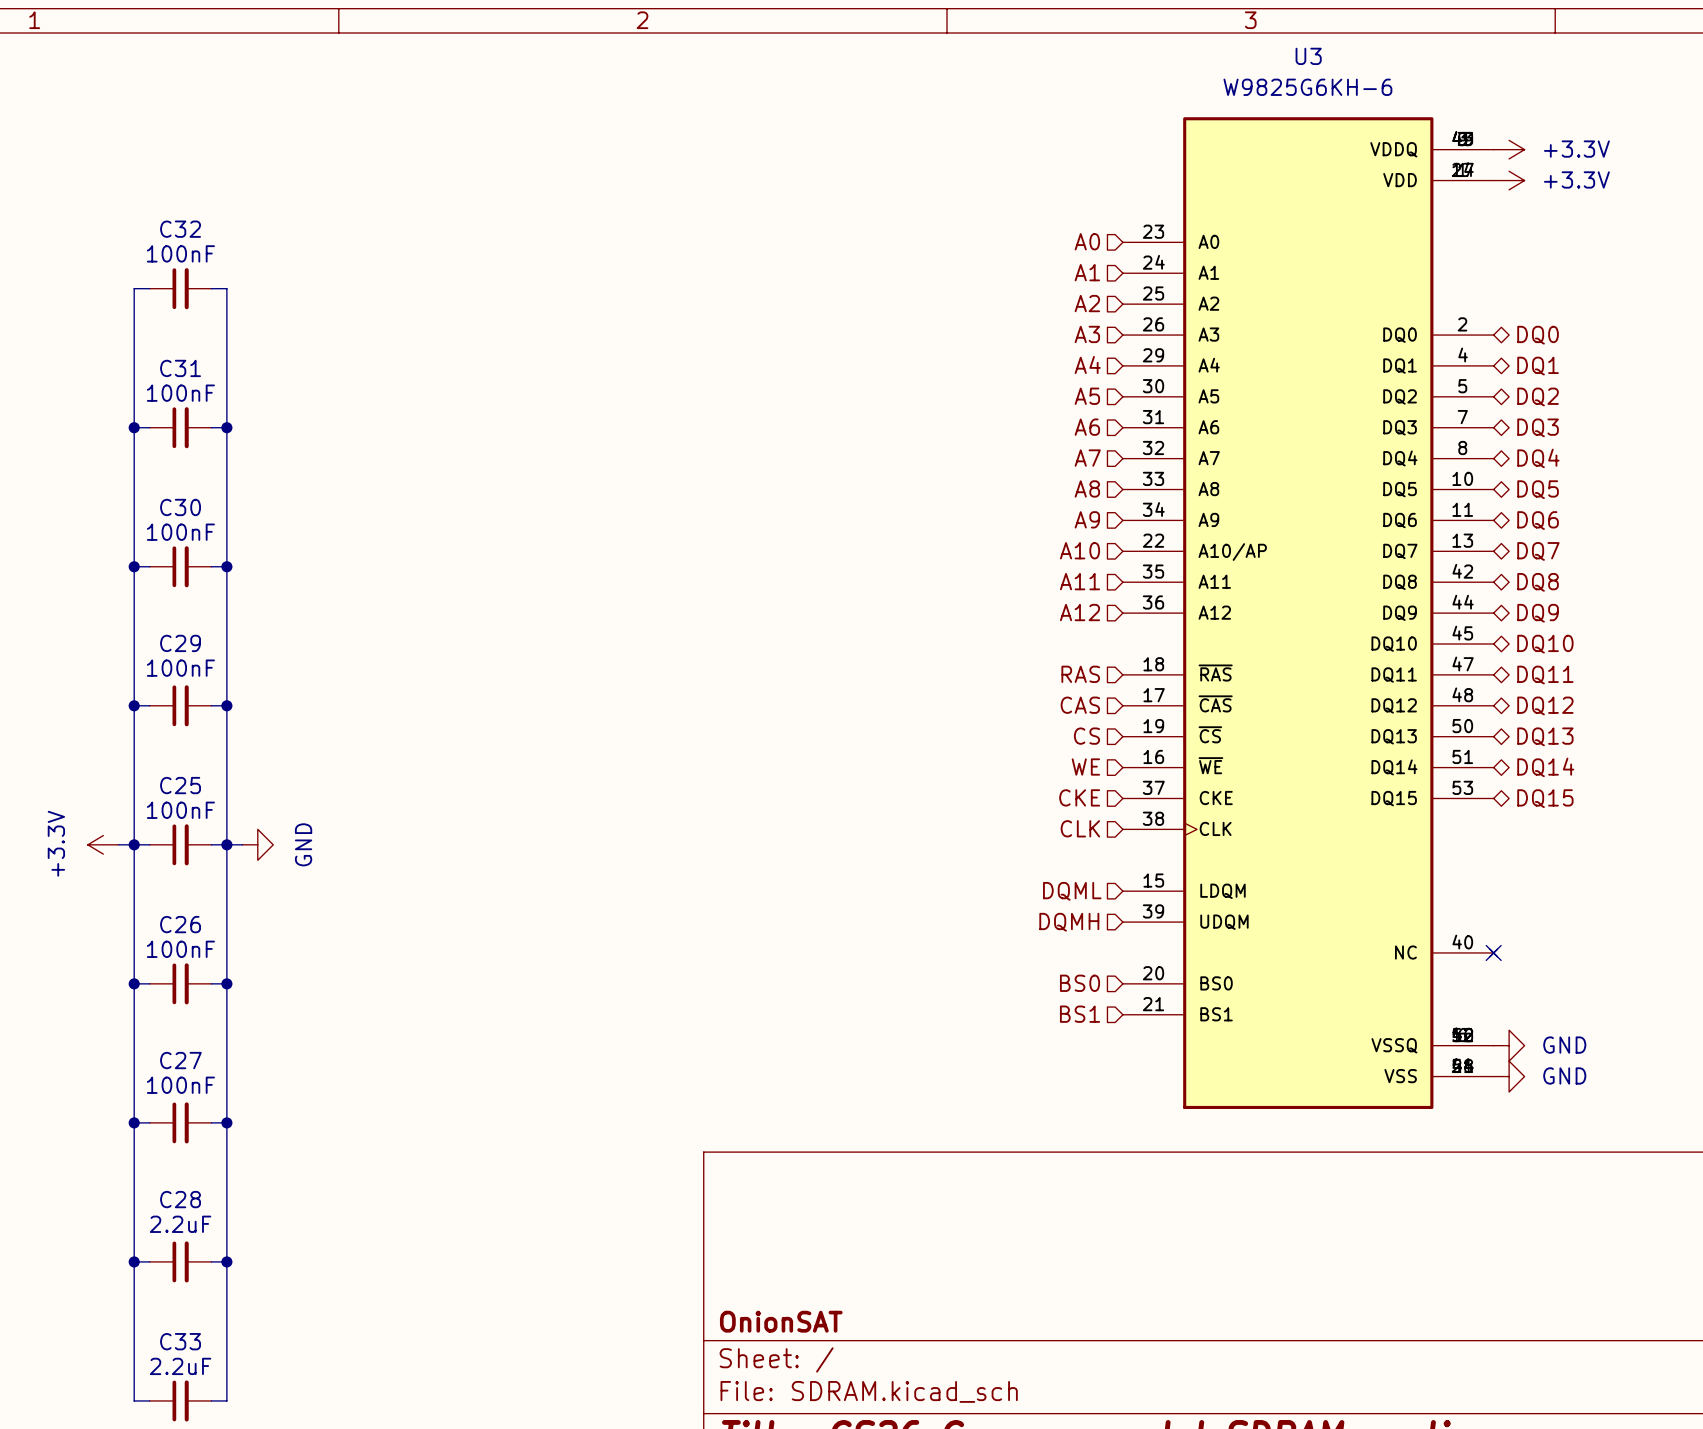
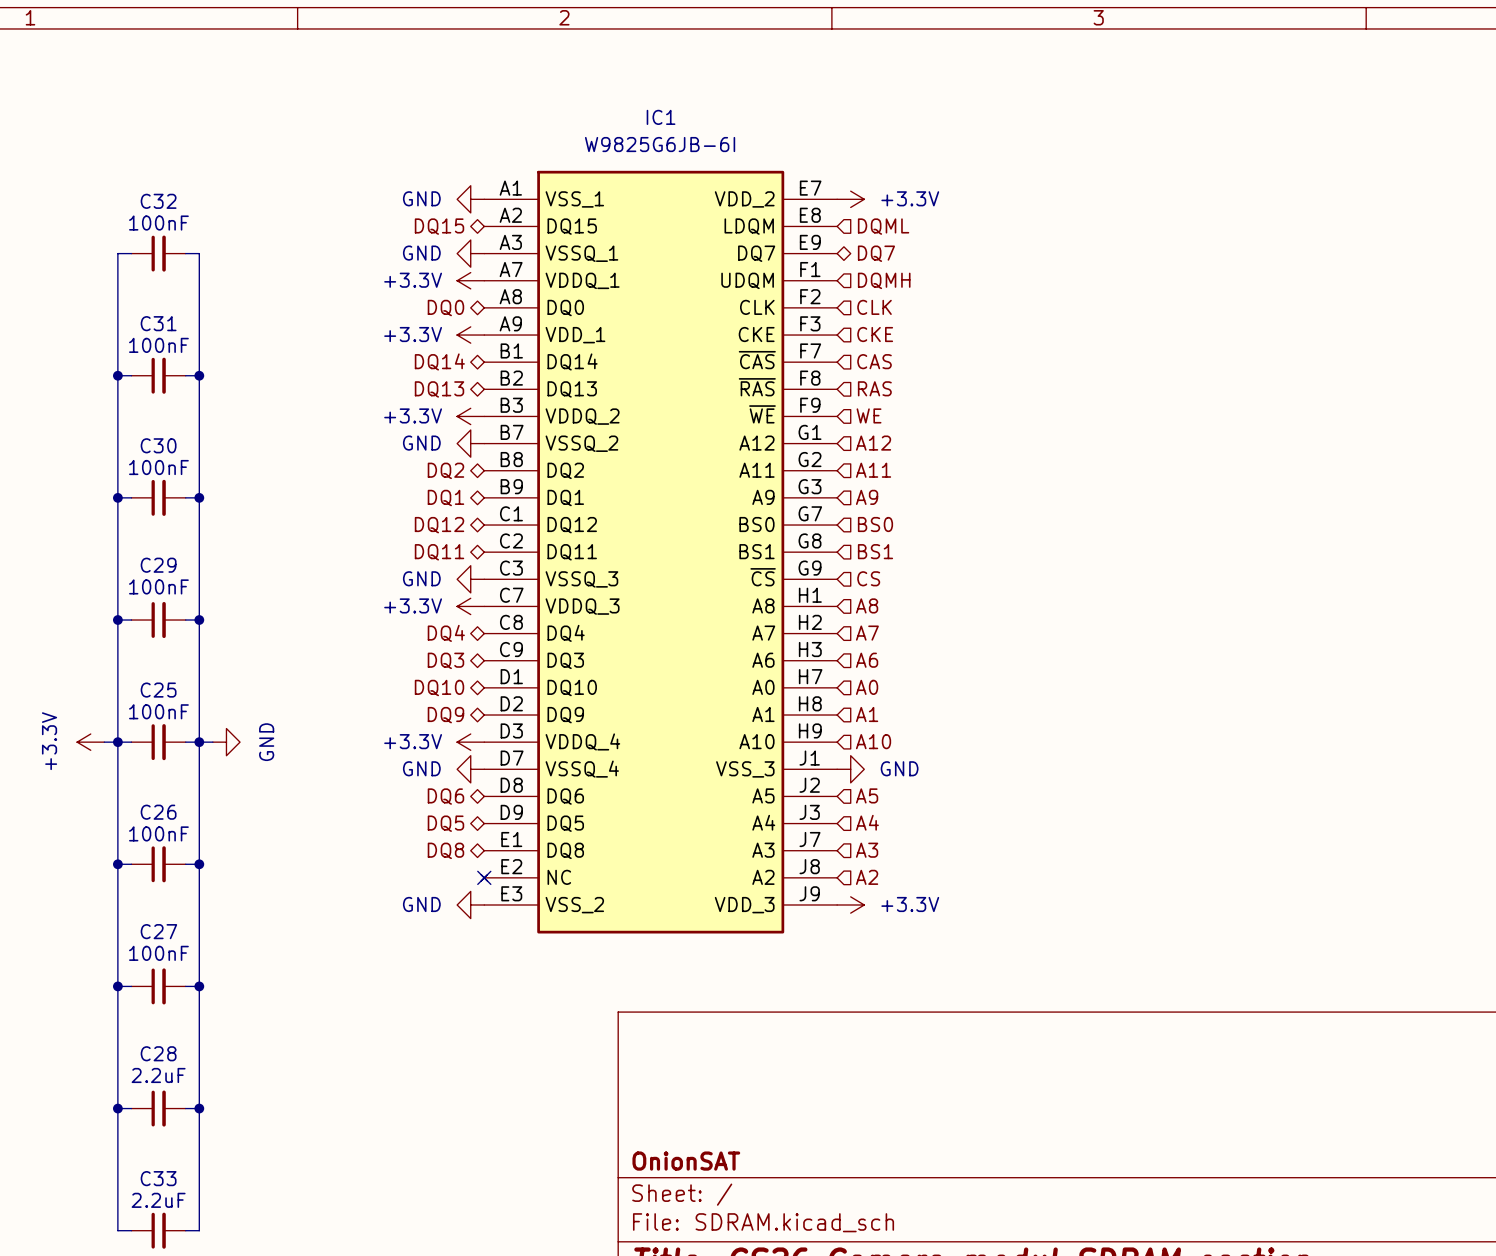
power symbol: +3.3V (1509, 149) -> none
power symbol: +3.3V (1509, 180) -> none
power symbol: none -> GND (470, 199)
power symbol: none -> +3.3V (850, 199)
hierarchical label: A0 (1087, 241) -> none
hierarchical label: none -> DQ15 (439, 226)
hierarchical label: none -> DQML (883, 226)
hierarchical label: A1 (1087, 272) -> none
power symbol: none -> GND (470, 253)
hierarchical label: none -> DQ7 (876, 253)
hierarchical label: A2 (1087, 303) -> none
power symbol: none -> +3.3V (470, 280)
hierarchical label: none -> DQMH (884, 280)
hierarchical label: A3 (1087, 334) -> none
hierarchical label: DQ0 (1538, 335) -> none
hierarchical label: none -> CLK (874, 307)
hierarchical label: none -> DQ0 (445, 308)
hierarchical label: A4 (1087, 364) -> none
hierarchical label: DQ1 (1538, 366) -> none
hierarchical label: none -> CKE (875, 334)
power symbol: none -> +3.3V (470, 335)
hierarchical label: A5 (1087, 396) -> none
hierarchical label: DQ2 (1538, 396) -> none
hierarchical label: none -> CAS (874, 361)
hierarchical label: none -> DQ14 (439, 361)
hierarchical label: A6 (1087, 427) -> none
hierarchical label: DQ3 (1538, 427) -> none
hierarchical label: none -> DQ13 (439, 389)
hierarchical label rotation: 0° (1087, 458) -> 180° (867, 633)
hierarchical label position: A7 (1087, 458) -> A7 (867, 633)
hierarchical label: DQ4 (1538, 458) -> none
hierarchical label: none -> WE (869, 415)
power symbol: none -> +3.3V (470, 416)
hierarchical label rotation: 0° (1087, 488) -> 180° (867, 605)
hierarchical label position: A8 (1087, 488) -> A8 (867, 605)
hierarchical label: DQ5 (1538, 489) -> none
power symbol: none -> GND (470, 443)
hierarchical label rotation: 0° (1087, 519) -> 180° (867, 497)
hierarchical label position: A9 (1087, 519) -> A9 (867, 497)
hierarchical label: DQ6 (1538, 520) -> none
hierarchical label: none -> DQ2 (445, 470)
hierarchical label: A10 (1079, 550) -> none
hierarchical label: DQ7 (1538, 551) -> none
hierarchical label: none -> DQ1 (445, 498)
hierarchical label rotation: 0° (1079, 581) -> 180° (873, 470)
hierarchical label position: A11 (1079, 581) -> A11 (873, 470)
hierarchical label: DQ8 (1538, 582) -> none
hierarchical label: none -> DQ12 (439, 525)
hierarchical label: none -> BS0 (875, 524)
hierarchical label rotation: 0° (1079, 612) -> 180° (873, 443)
hierarchical label position: A12 (1079, 612) -> A12 (873, 443)
U3: W9825G6KH-6 (1310, 613) -> none
hierarchical label: DQ9 (1538, 613) -> none
hierarchical label: none -> BS1 (875, 551)
hierarchical label: none -> DQ11 (439, 552)
IC1: none -> W9825G6JB-6I (659, 552)
hierarchical label: DQ10 (1545, 644) -> none
power symbol: none -> GND (470, 579)
hierarchical label rotation: 0° (1080, 674) -> 180° (874, 388)
hierarchical label position: RAS (1080, 674) -> RAS (874, 388)
hierarchical label: DQ11 (1545, 675) -> none
power symbol: none -> +3.3V (470, 606)
hierarchical label: CAS (1080, 705) -> none
hierarchical label: DQ12 (1545, 705) -> none
hierarchical label: none -> DQ4 (446, 633)
hierarchical label rotation: 0° (1086, 736) -> 180° (868, 578)
hierarchical label position: CS (1086, 736) -> CS (868, 578)
hierarchical label: DQ13 (1545, 736) -> none
hierarchical label: none -> A6 (867, 660)
hierarchical label: none -> DQ3 (445, 660)
hierarchical label: WE (1085, 767) -> none
hierarchical label: DQ14 (1545, 767) -> none
hierarchical label: none -> A0 (867, 687)
hierarchical label: none -> DQ10 (439, 688)
hierarchical label: CKE (1079, 797) -> none
hierarchical label: DQ15 (1545, 798) -> none
hierarchical label: none -> A1 (867, 714)
hierarchical label: none -> DQ9 (445, 715)
hierarchical label: CLK (1080, 828) -> none
power symbol: none -> +3.3V (470, 742)
hierarchical label: none -> A10 (873, 741)
power symbol: none -> GND (470, 769)
power symbol: none -> GND (850, 769)
hierarchical label: DQML (1072, 891) -> none
hierarchical label: none -> DQ6 (445, 796)
hierarchical label: none -> A5 (867, 795)
hierarchical label: DQMH (1069, 922) -> none
hierarchical label: none -> A4 (867, 822)
hierarchical label: none -> DQ5 (445, 823)
no-connect mark: (1493, 952) -> none
hierarchical label: none -> A3 (867, 850)
hierarchical label: none -> DQ8 (445, 850)
hierarchical label: BS0 (1079, 983) -> none
hierarchical label: none -> A2 (867, 877)
no-connect mark: none -> (484, 877)
hierarchical label: BS1 (1079, 1014) -> none
power symbol: none -> GND (470, 904)
power symbol: none -> +3.3V (850, 904)
power symbol: GND (1509, 1045) -> none
power symbol: GND (1509, 1076) -> none

